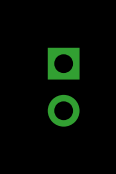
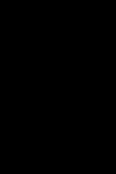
part: (63, 87) -> none

